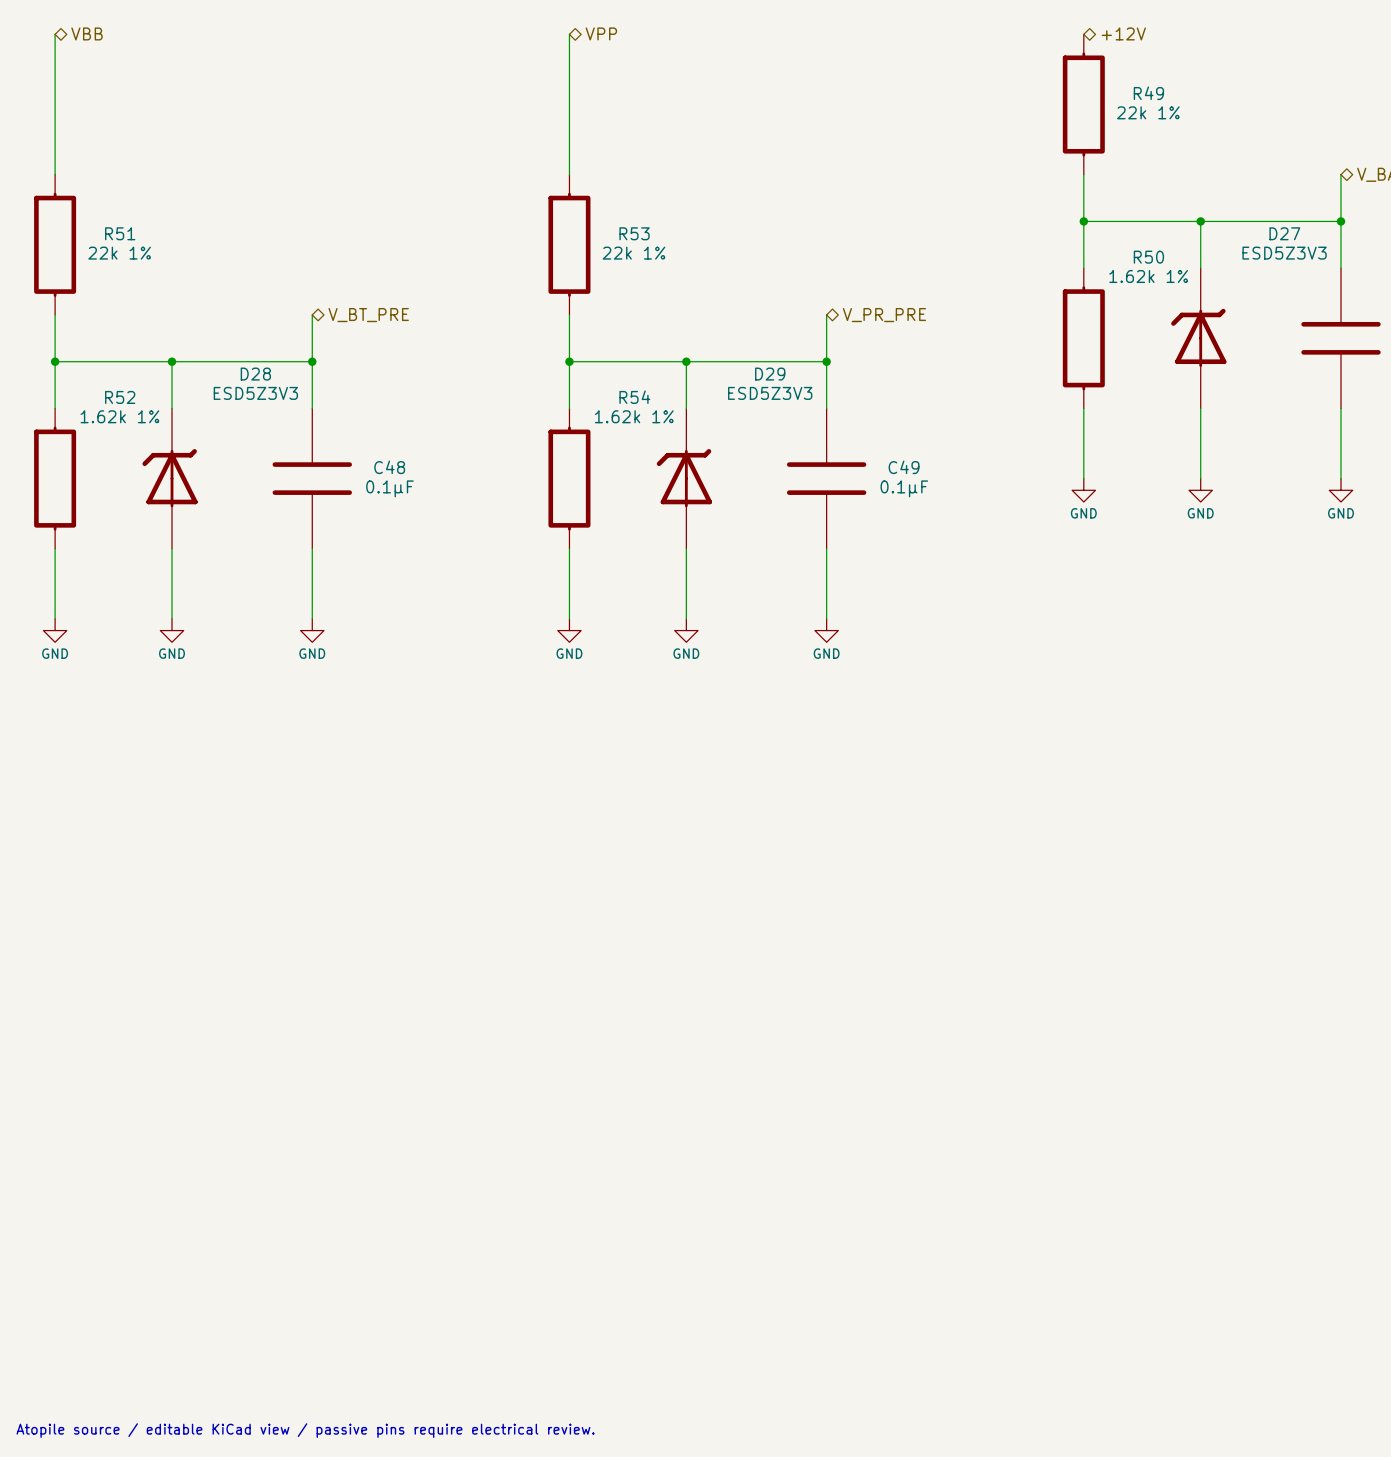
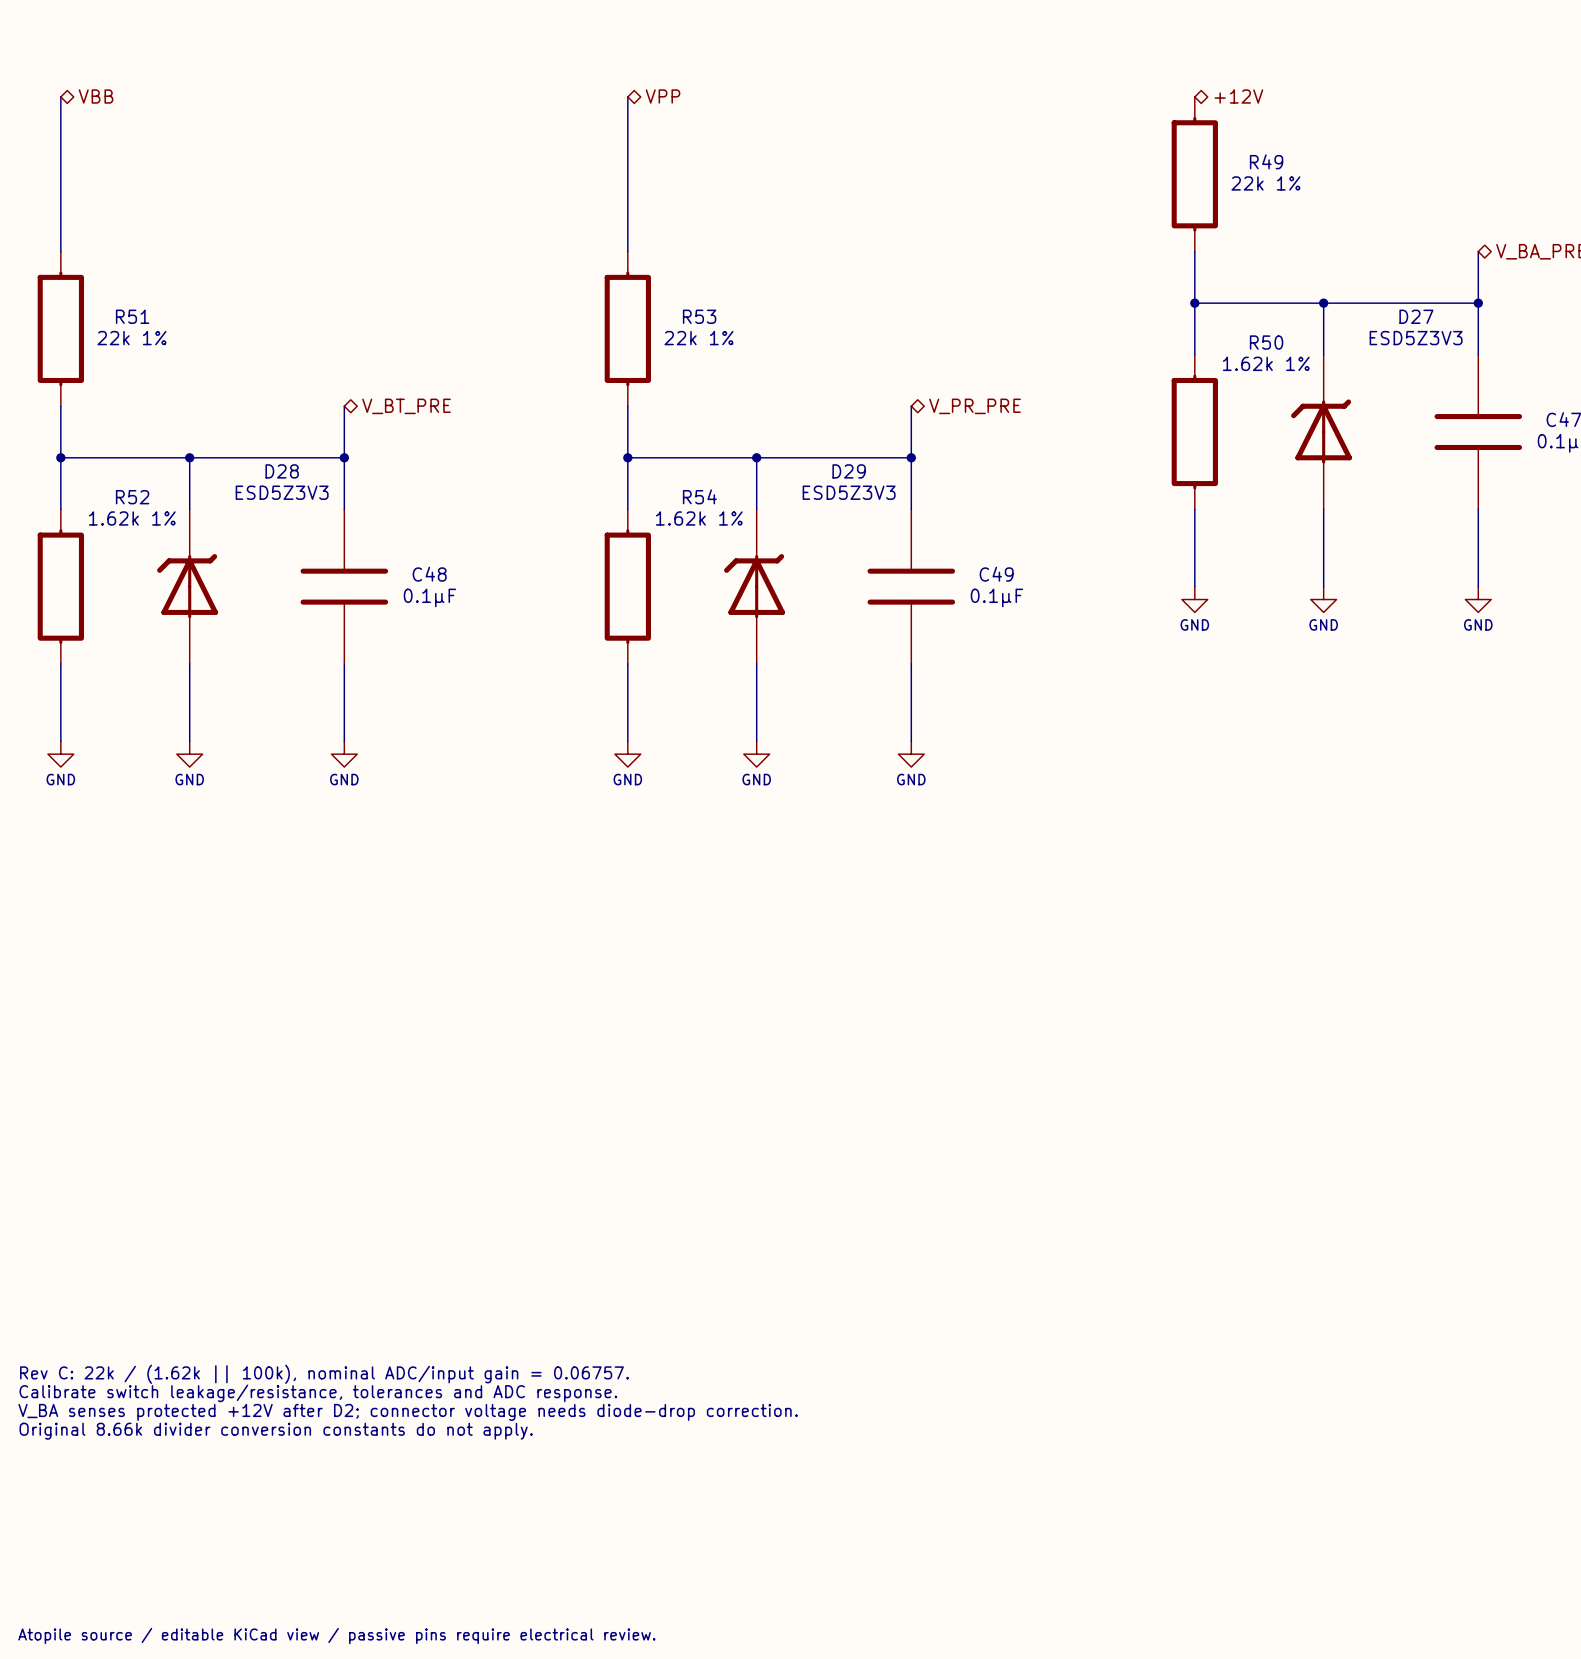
text: none -> Rev C: 22k / (1.62k || 100k), nominal ADC/input gain = 0.06757. (324, 1374)
text: none -> Calibrate switch leakage/resistance, tolerances and ADC response. (318, 1393)
text: none -> V_BA senses protected +12V after D2; connector voltage needs diode-drop correction. (408, 1412)
text: none -> Original 8.66k divider conversion constants do not apply. (276, 1431)

